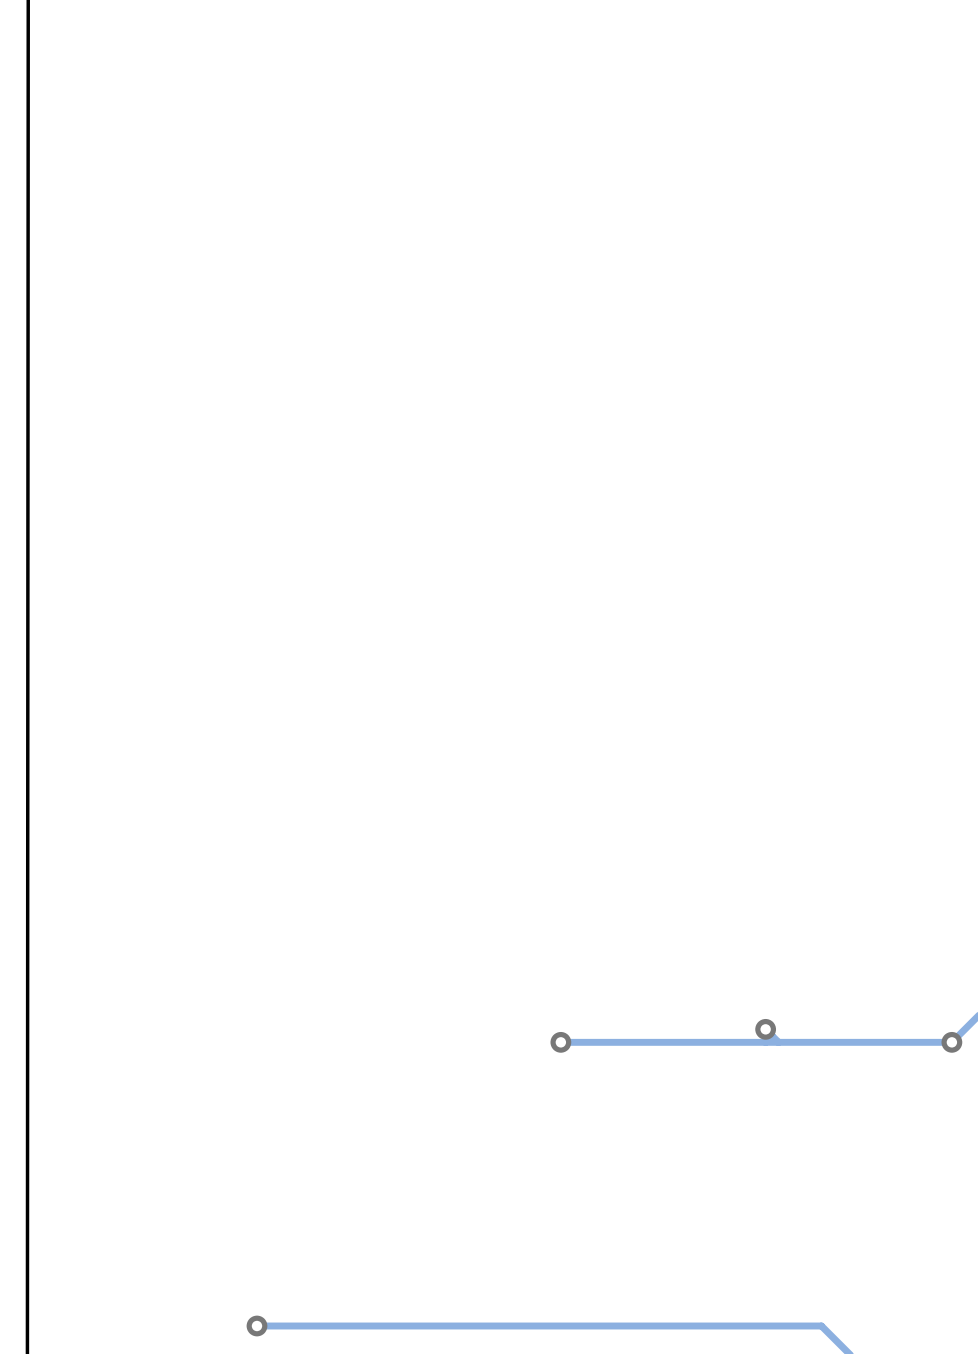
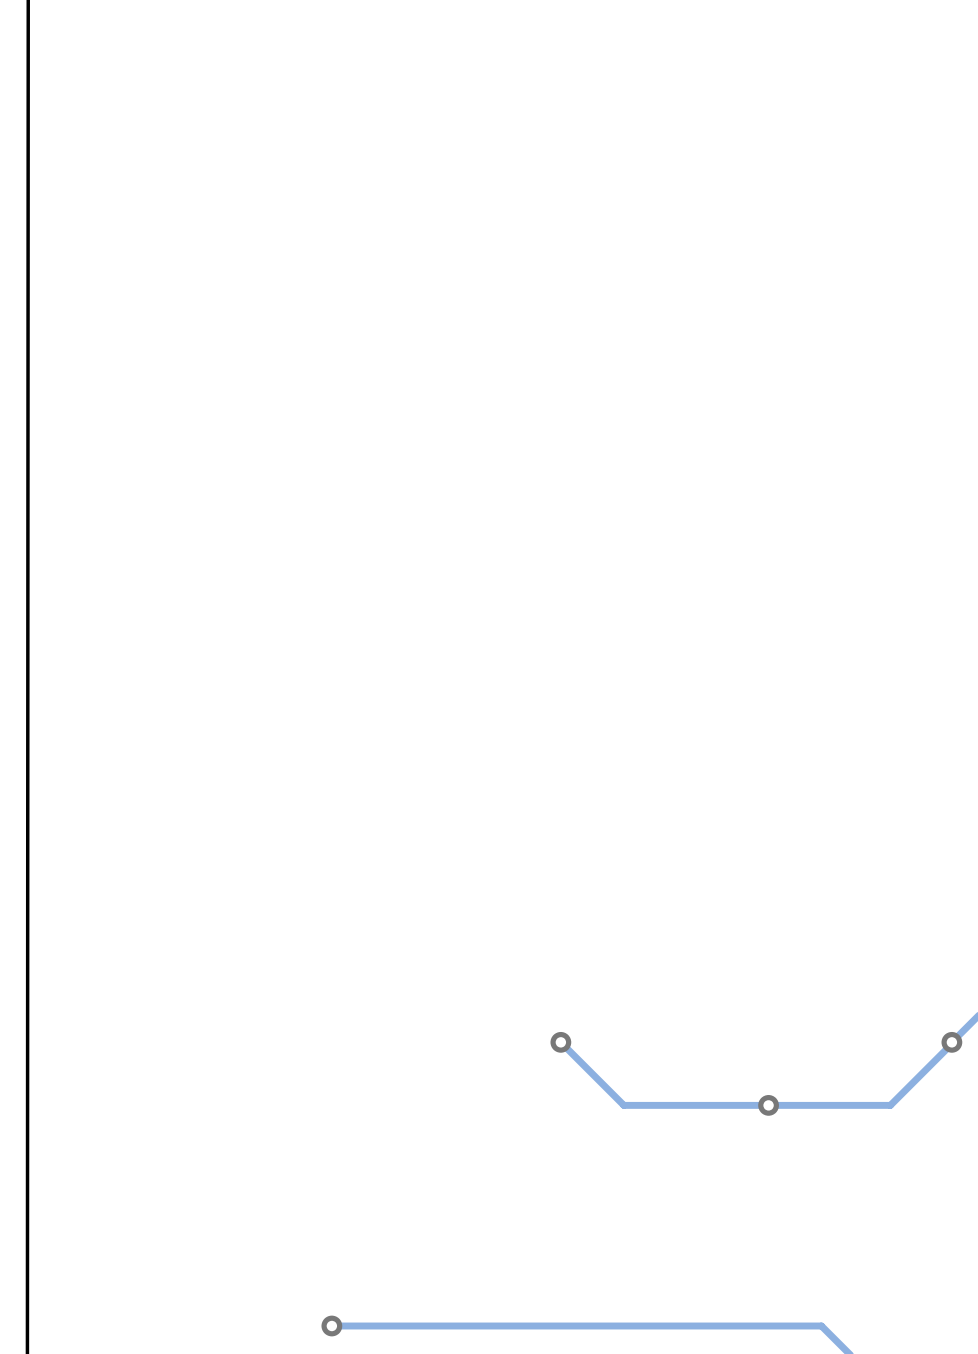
via position: (765, 1029) -> (768, 1105)
track: (765, 1035) (772, 1035) (778, 1042) (951, 1042) -> none
track: (777, 1042) (560, 1042) -> (951, 1042) (890, 1105) (623, 1105) (560, 1042)
via position: (256, 1326) -> (331, 1326)
track: (331, 1326) (256, 1326) -> none

